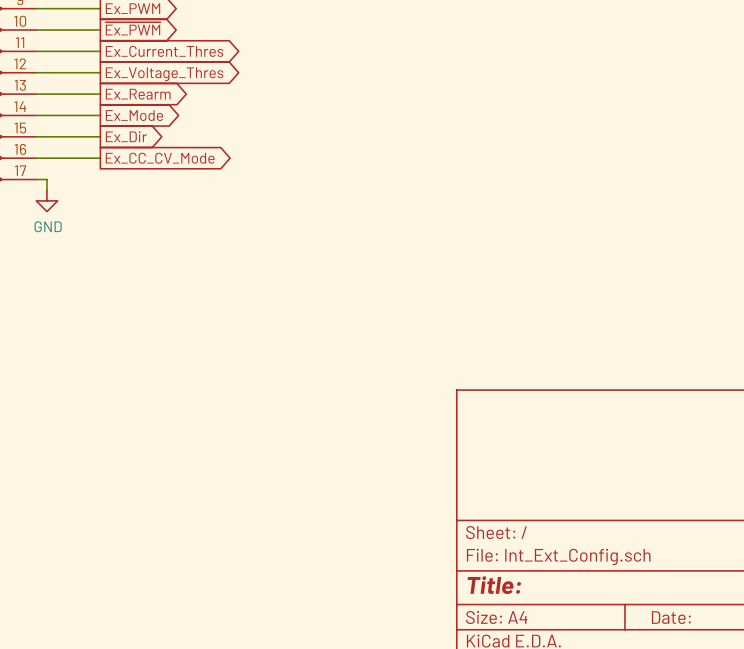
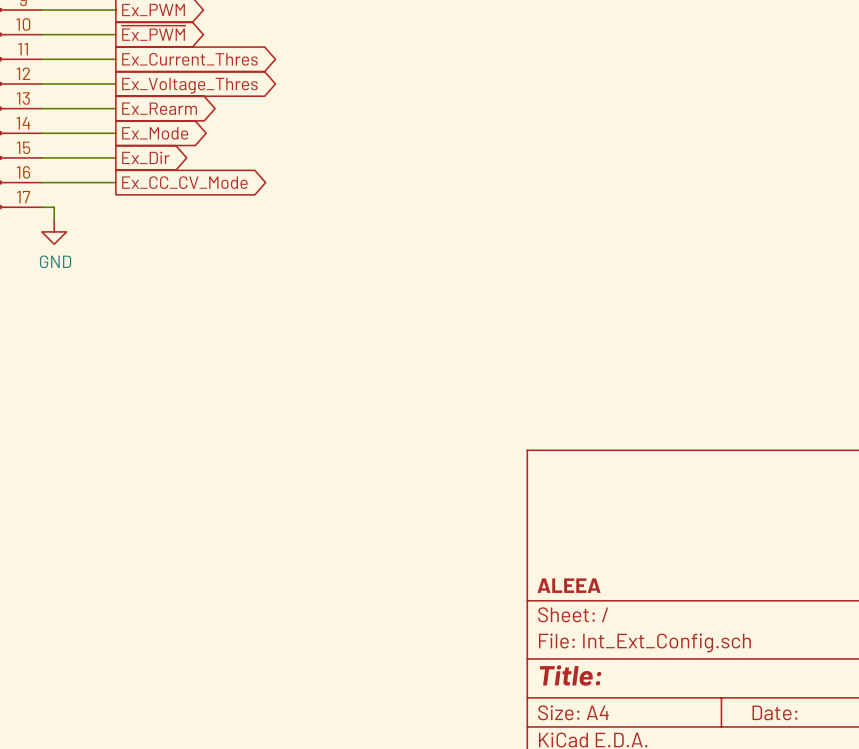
title block: none -> ALEEA (569, 585)

